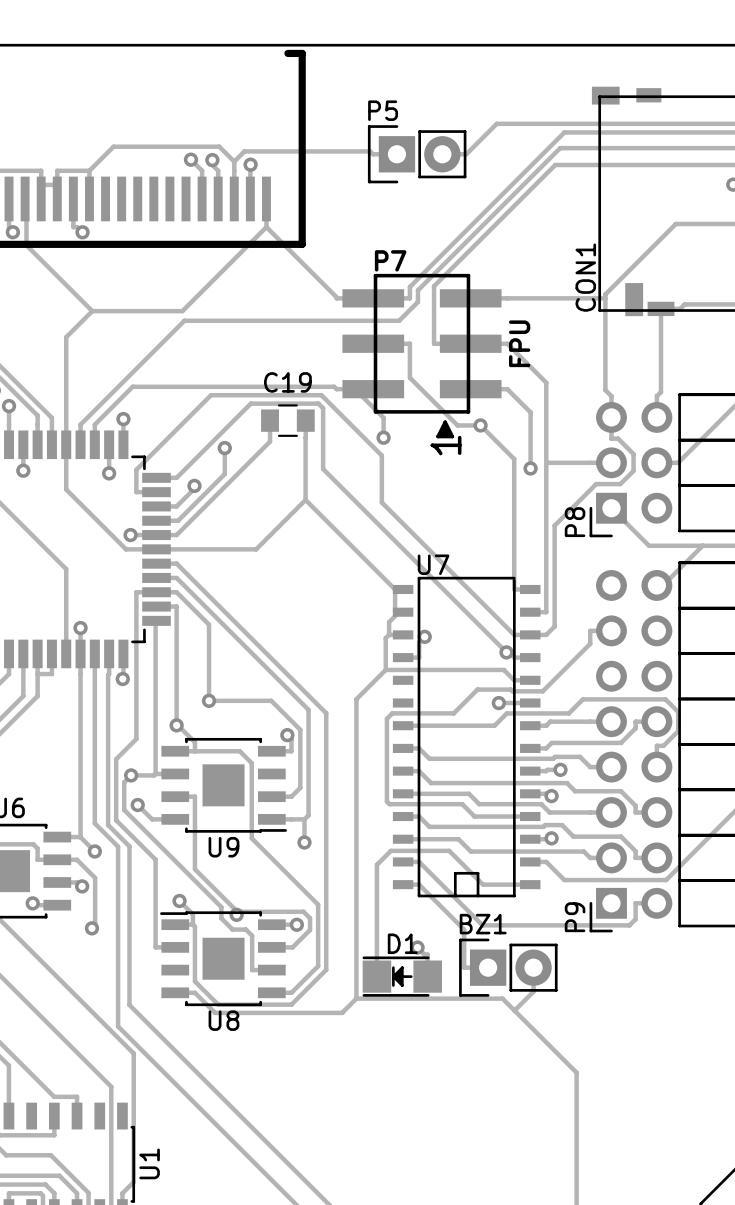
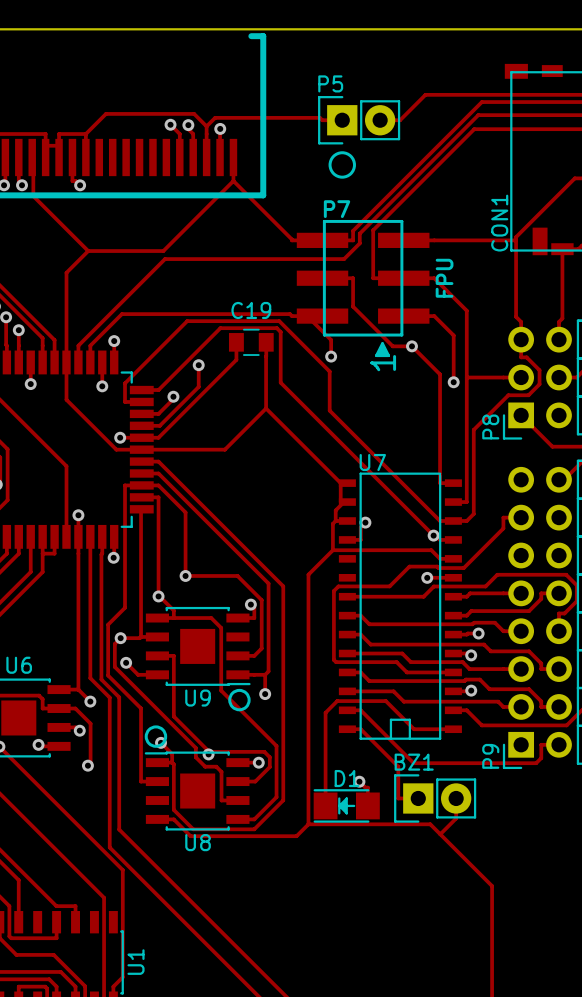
drawing: none -> [328, 151, 356, 179]
drawing: none -> [228, 688, 251, 712]
drawing: none -> [144, 725, 168, 748]

